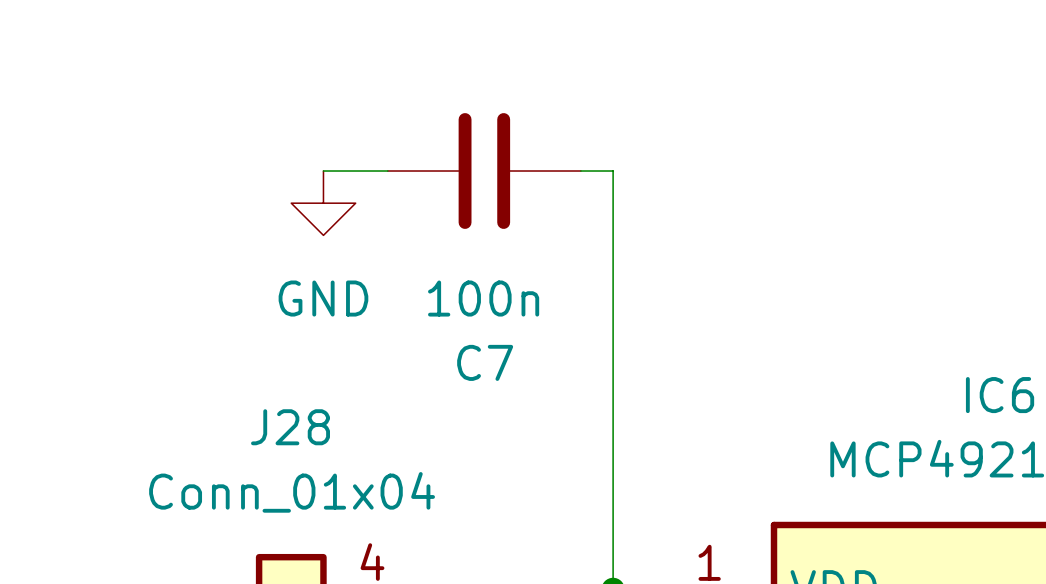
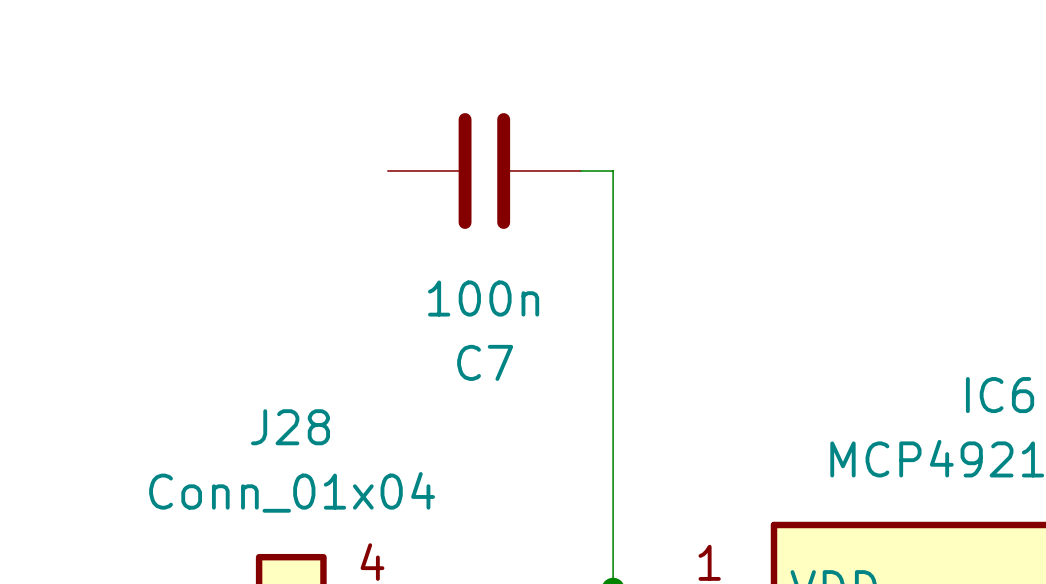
wire: (323, 171) (387, 171) -> none
power symbol: GND (323, 203) -> none

